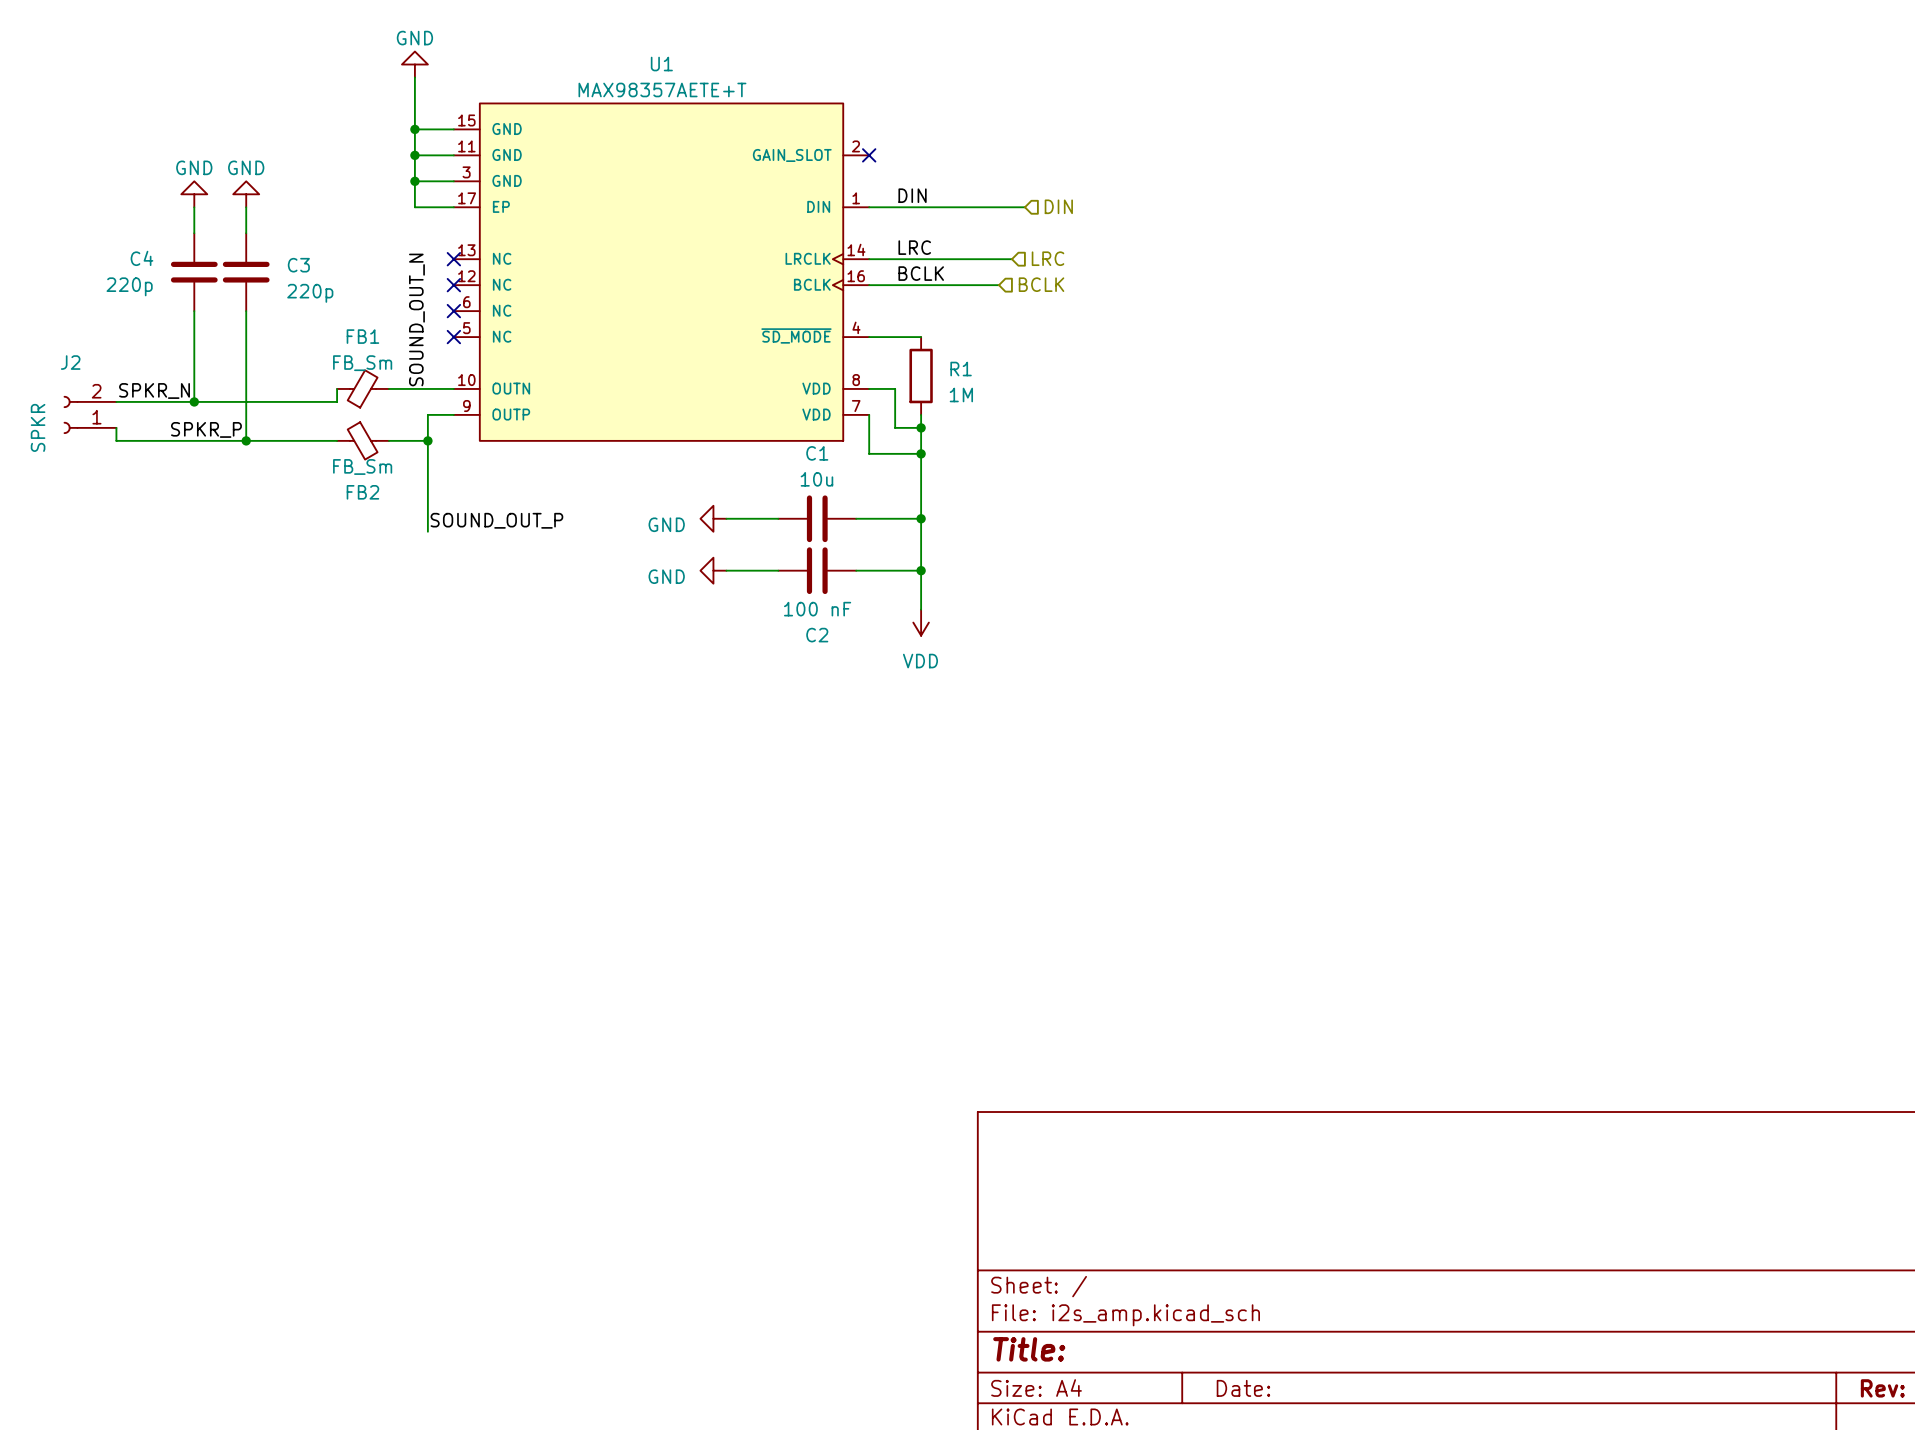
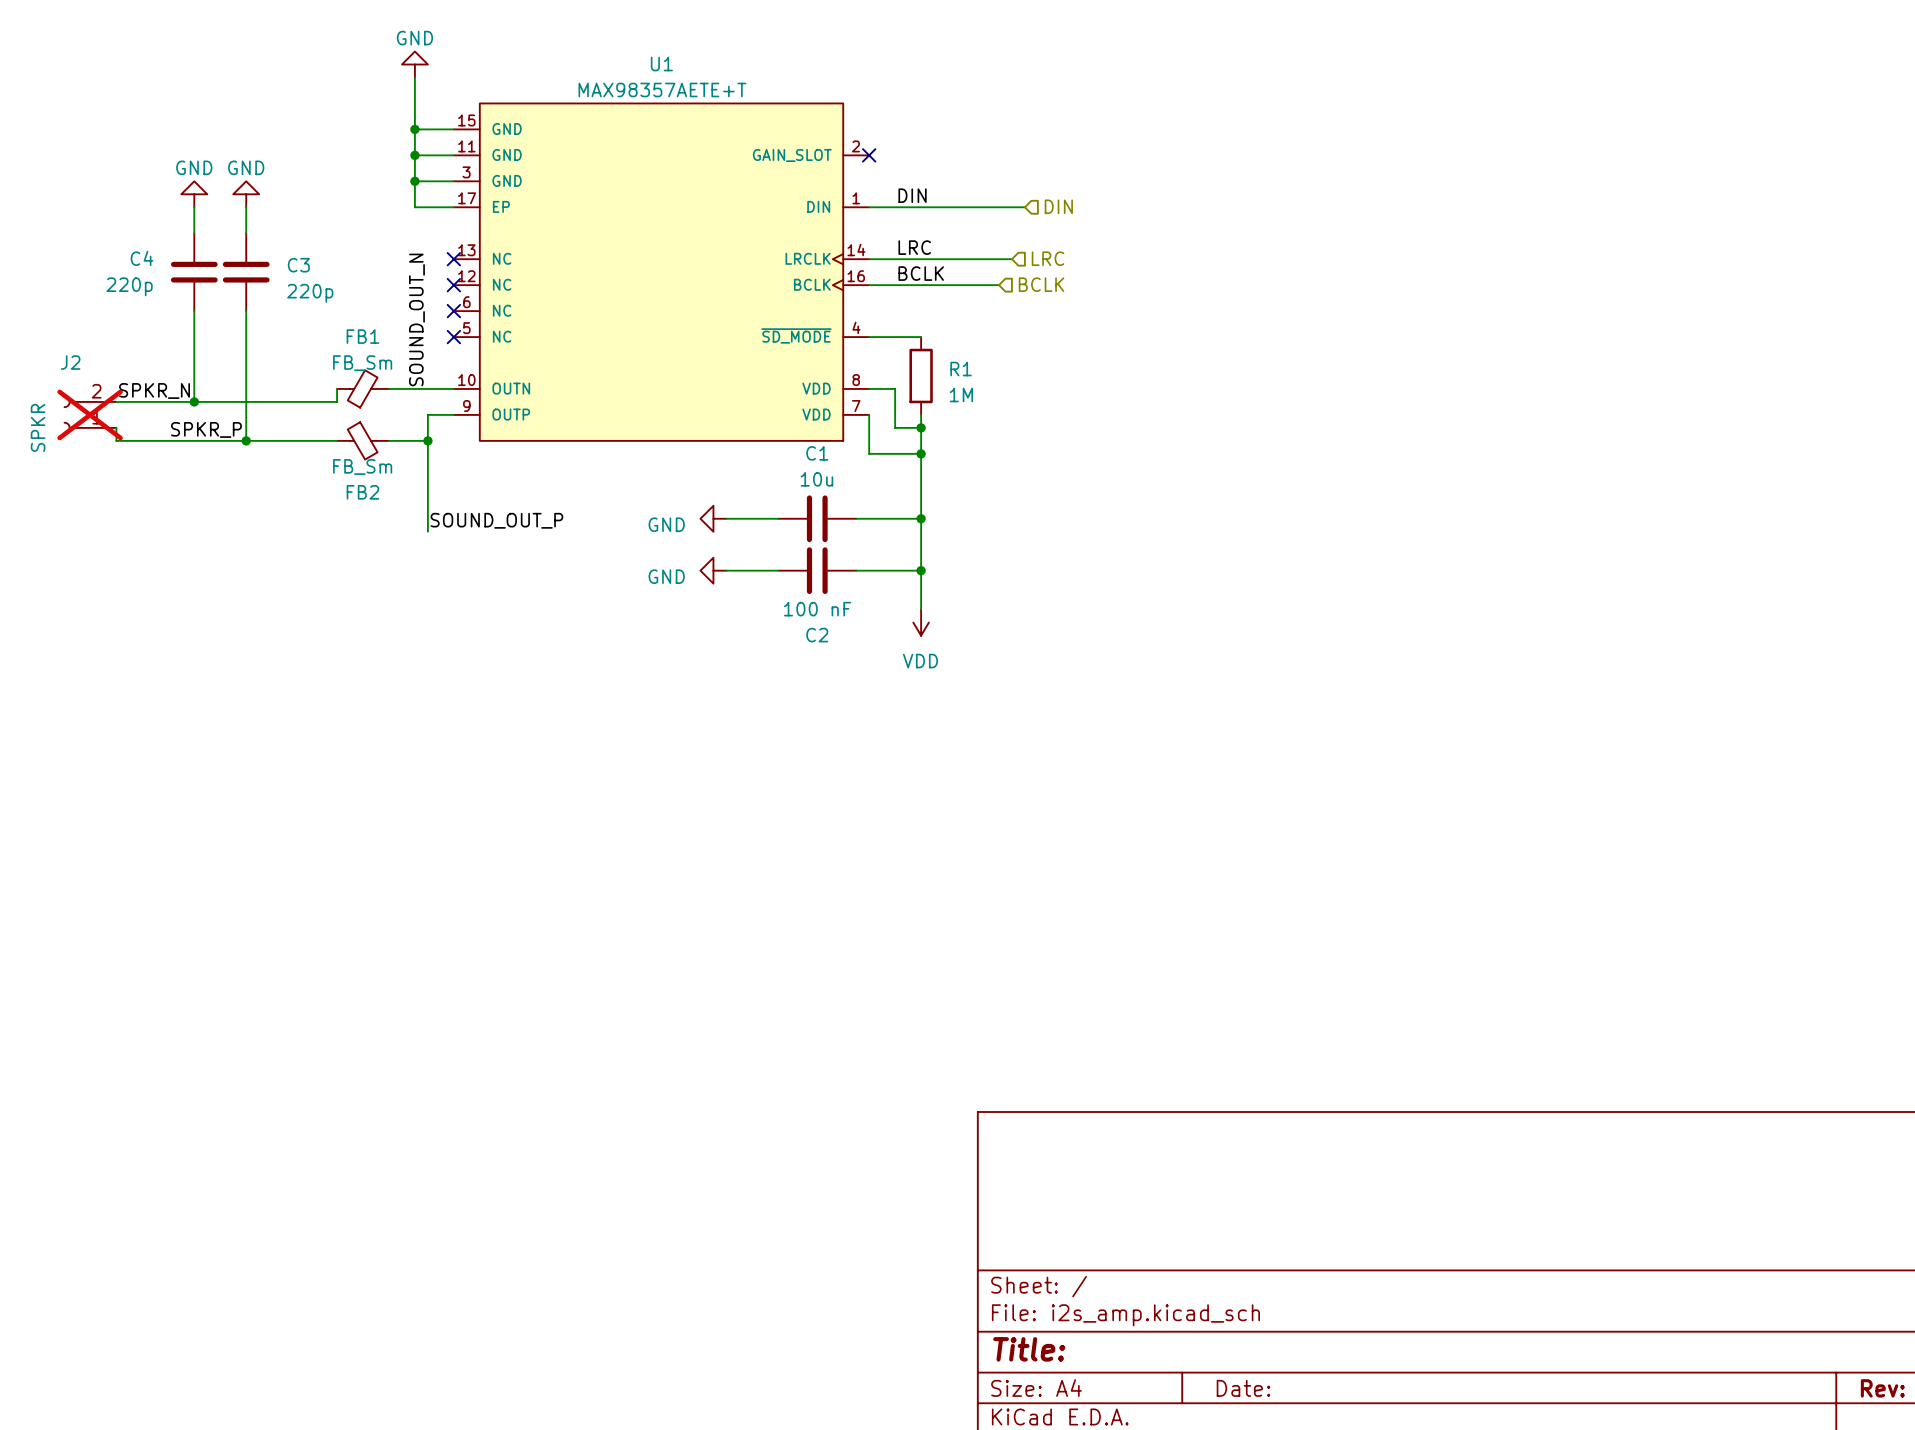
J2 do-not-place cross: none -> (90, 414)

